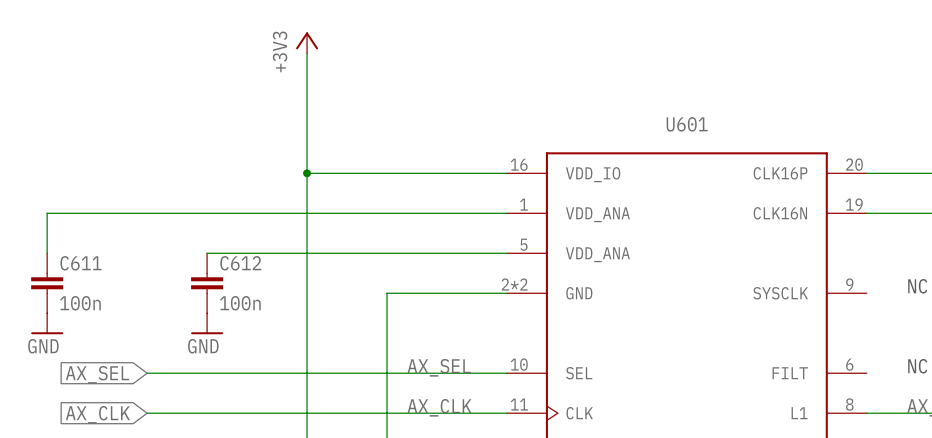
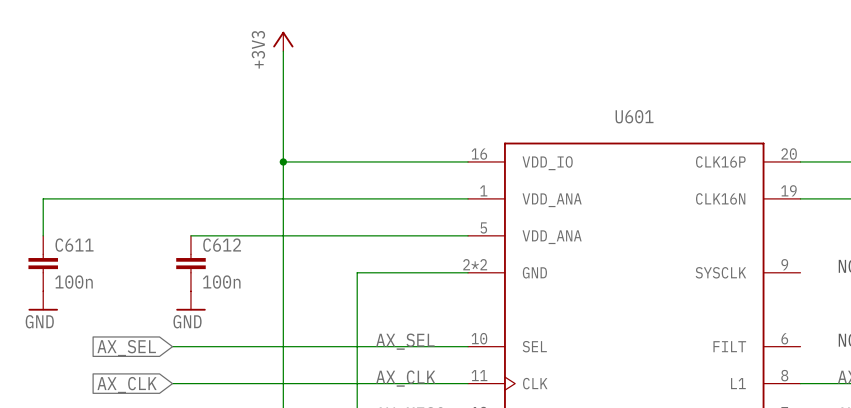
wire: (147, 373) (187, 373) -> none
global label position: AX_SEL (97, 374) -> AX_SEL (126, 348)
wire: (147, 413) (187, 413) -> none
global label position: AX_CLK (97, 414) -> AX_CLK (127, 385)

